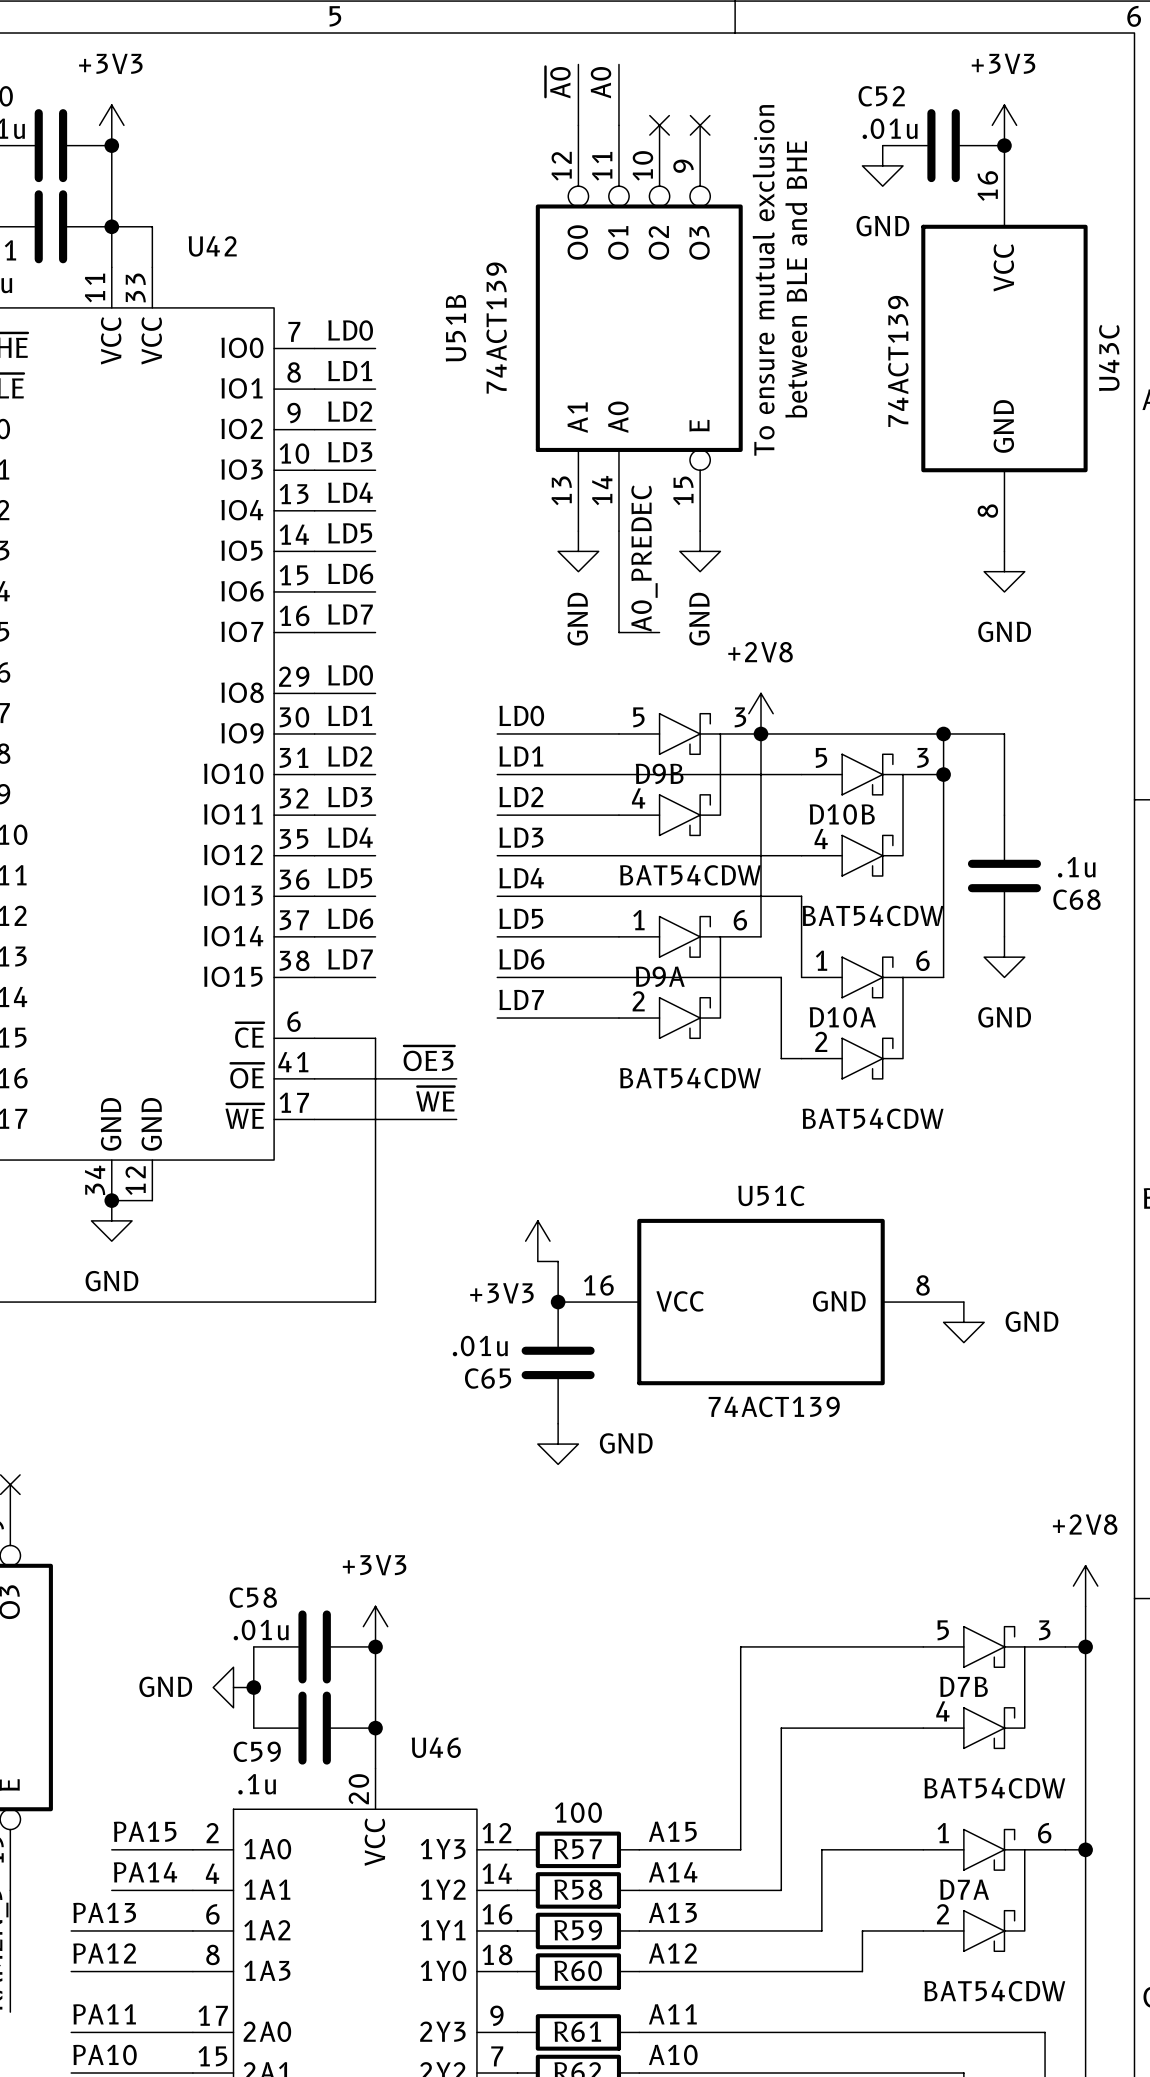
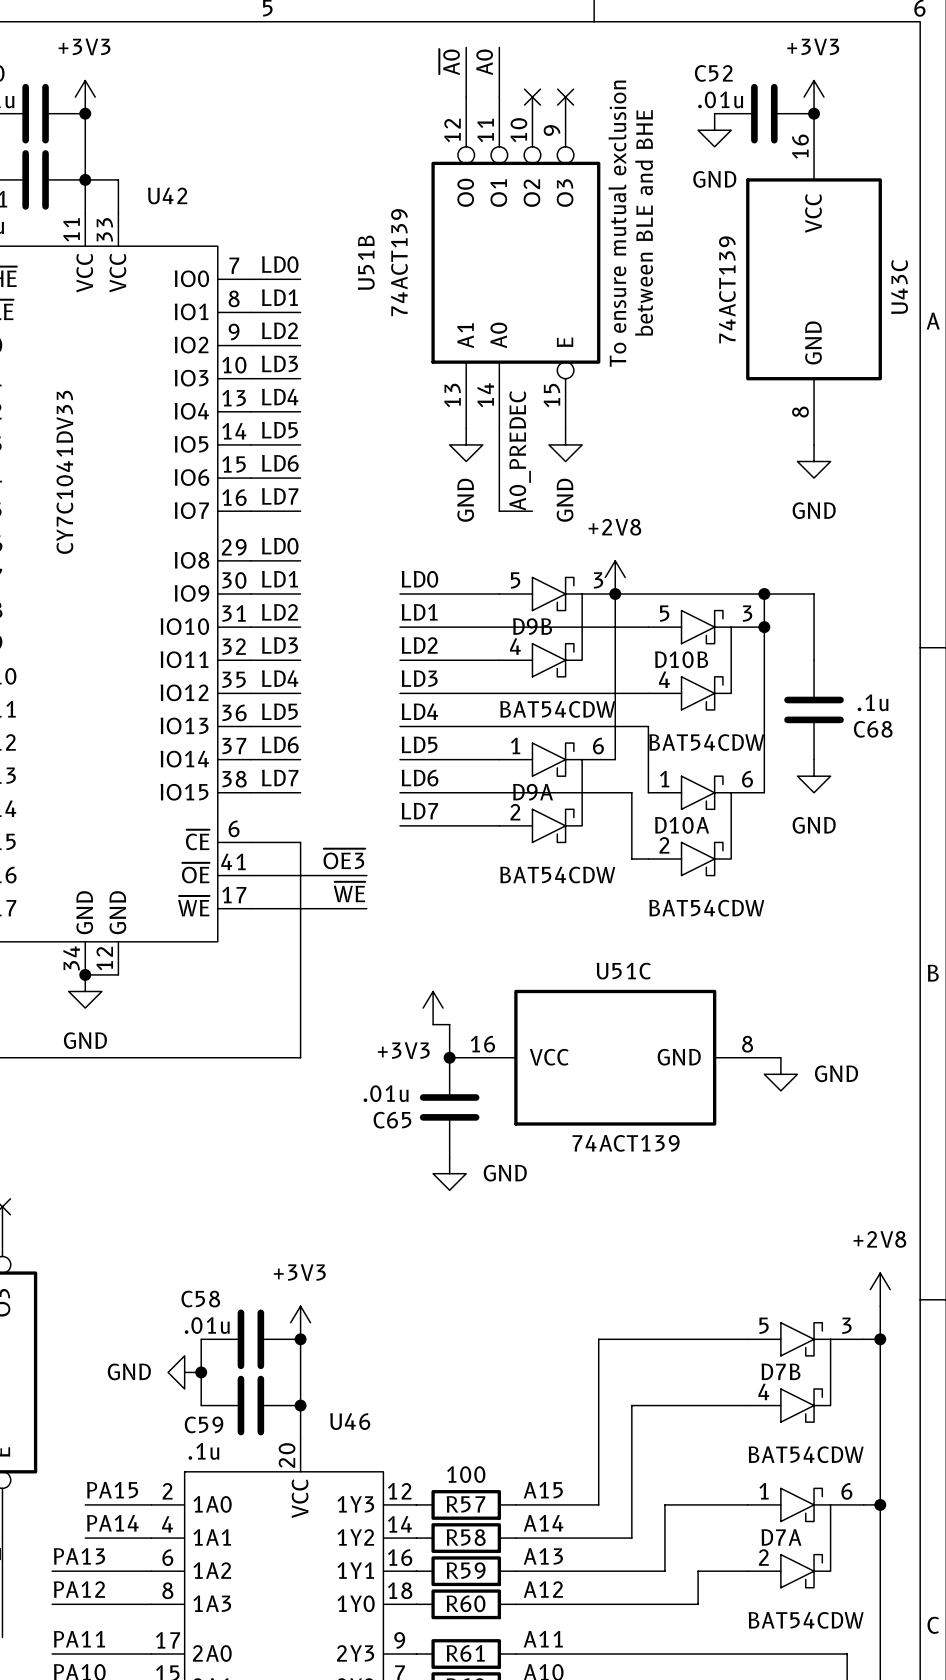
text: none -> CY7C1041DV33 (64, 472)

